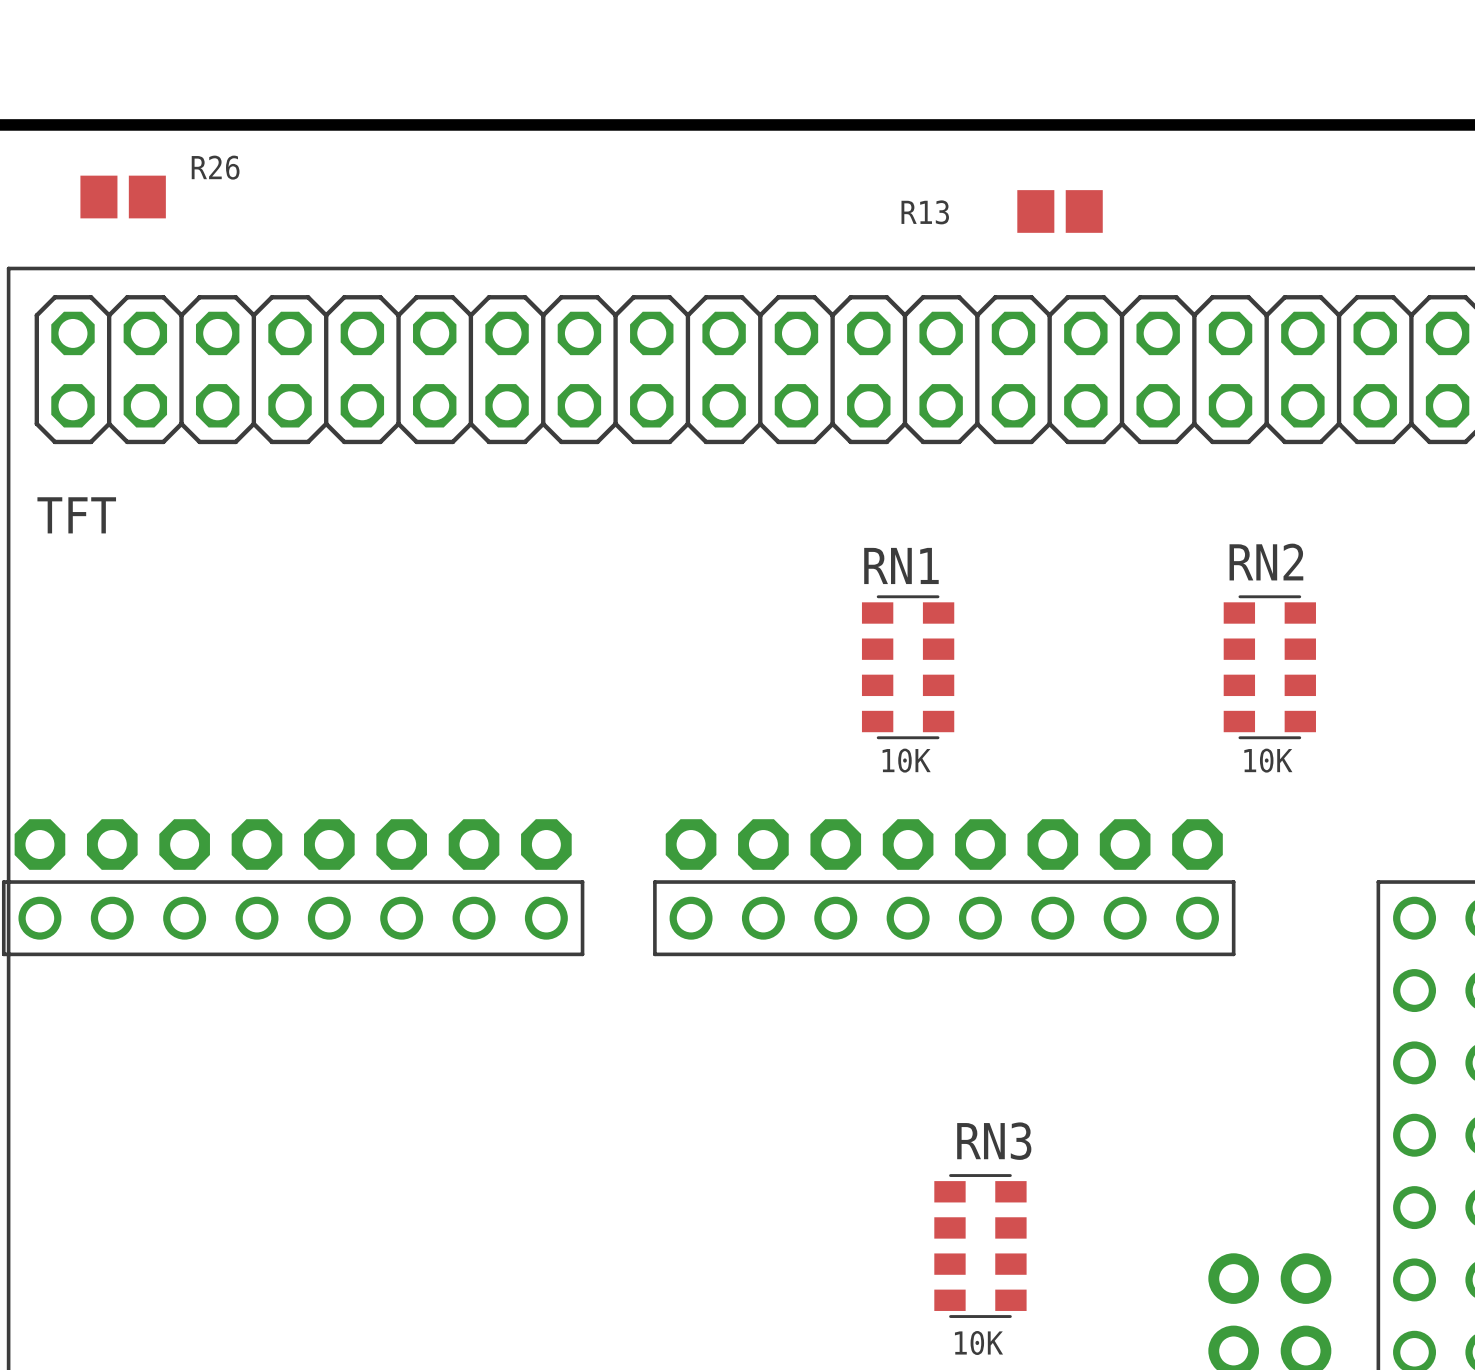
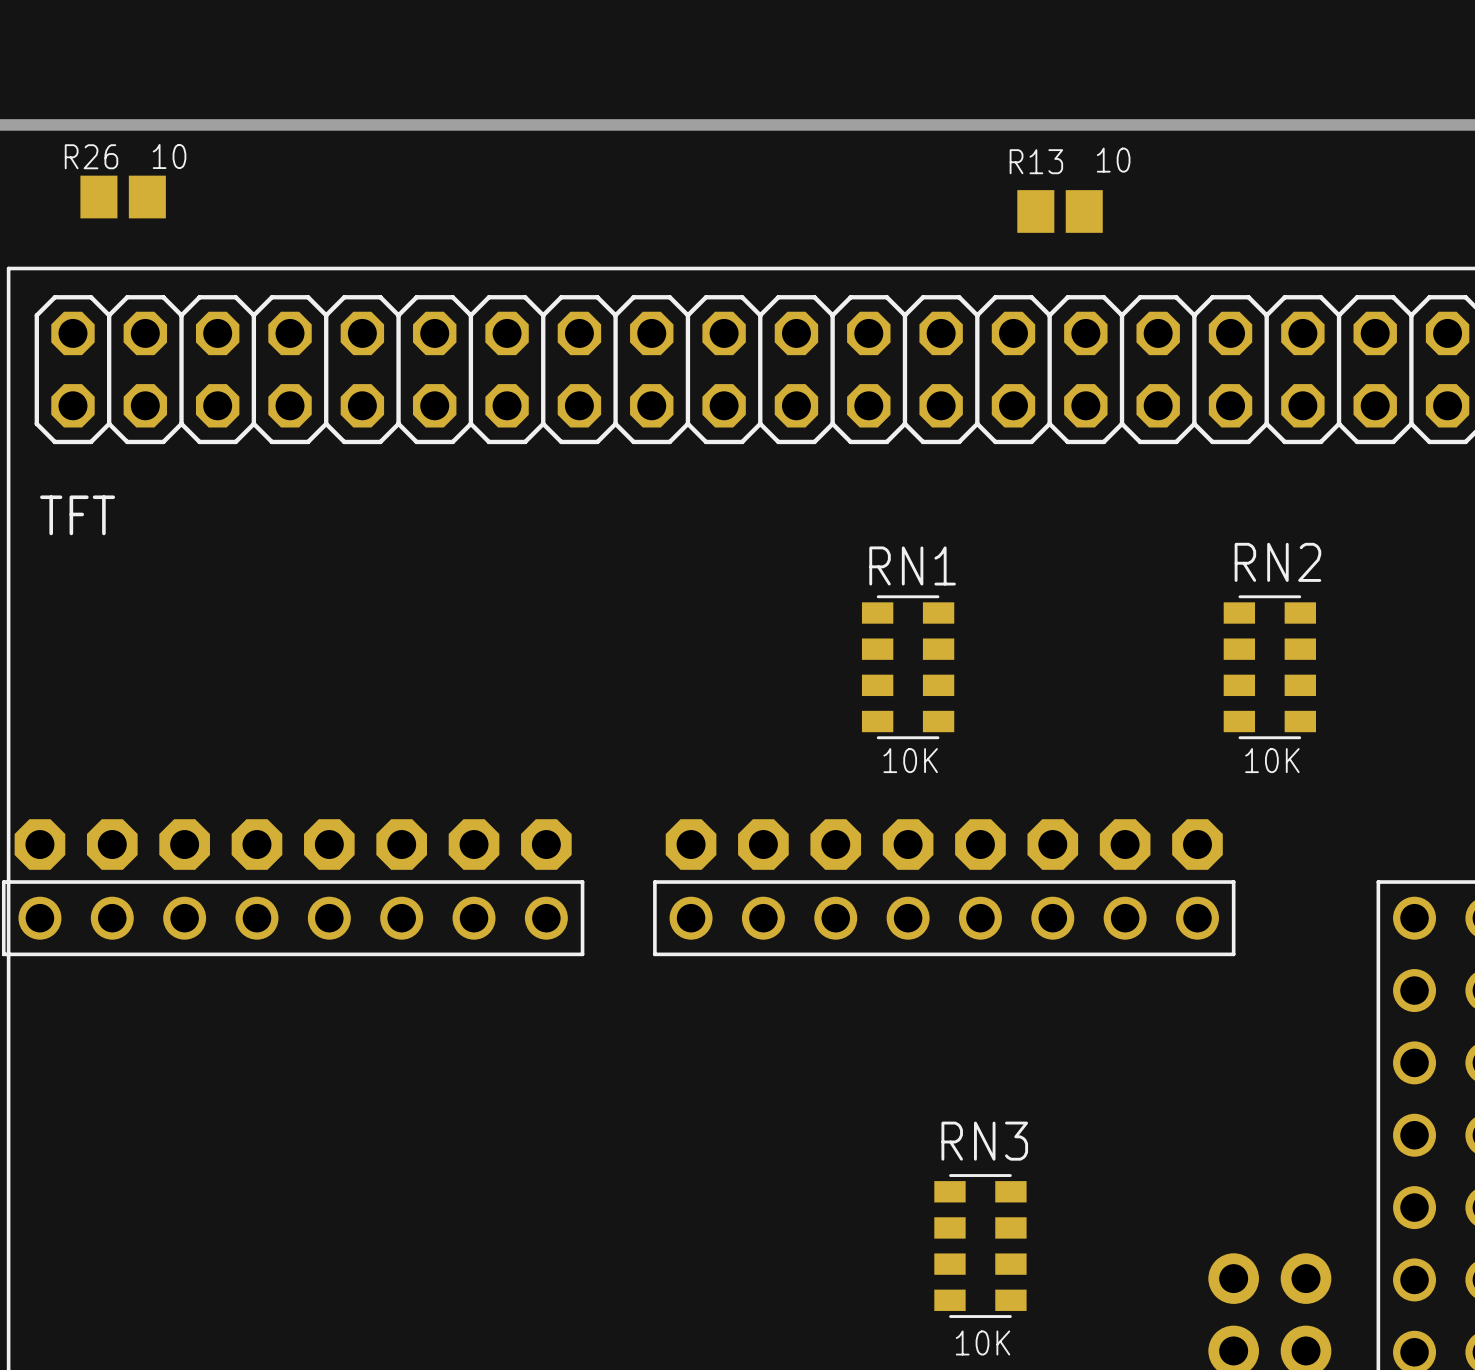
text: none -> 10 (169, 156)
text: none -> 10 (1113, 160)
R26 name position: R26 (215, 167) -> R26 (91, 156)
R13 name position: R13 (925, 212) -> R13 (1036, 161)

